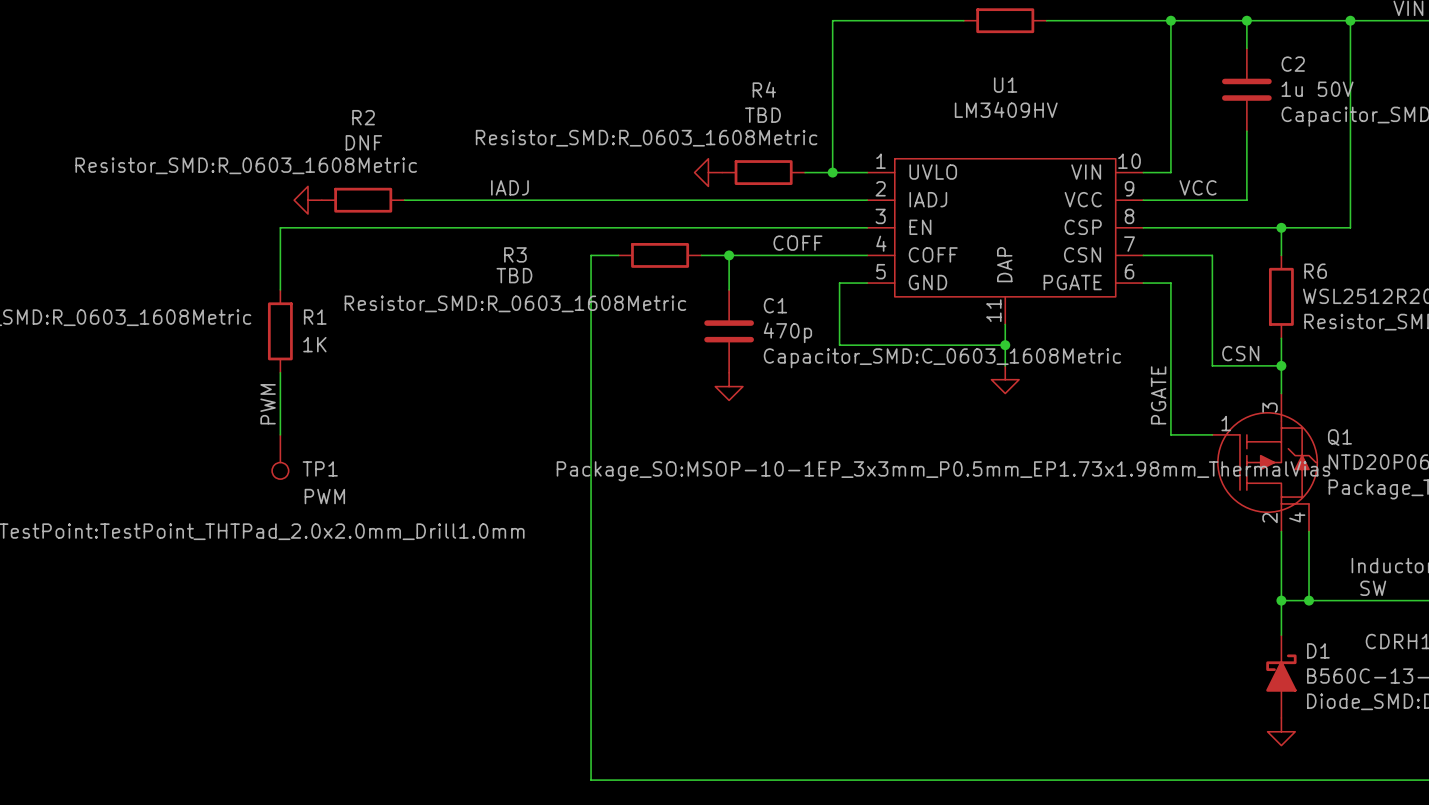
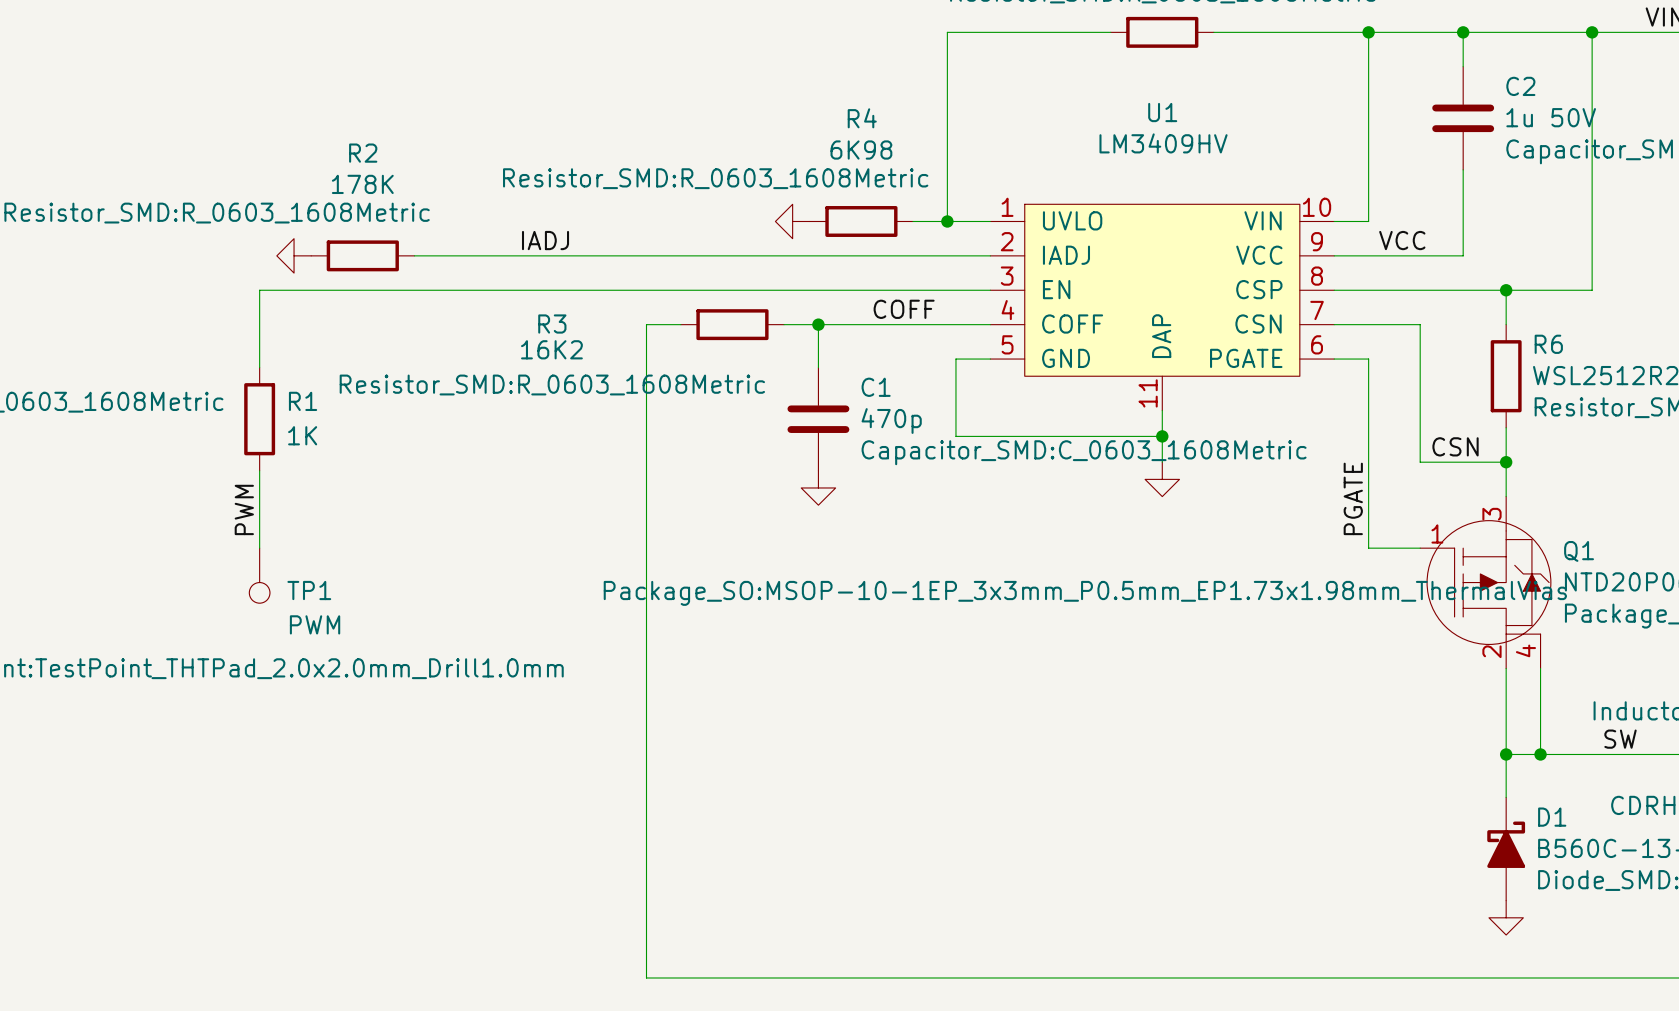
R4 value: TBD (762, 115) -> 6K98 (861, 150)
R2 value: DNF (363, 142) -> 178K (362, 184)
R3 value: TBD (514, 275) -> 16K2 (551, 349)

